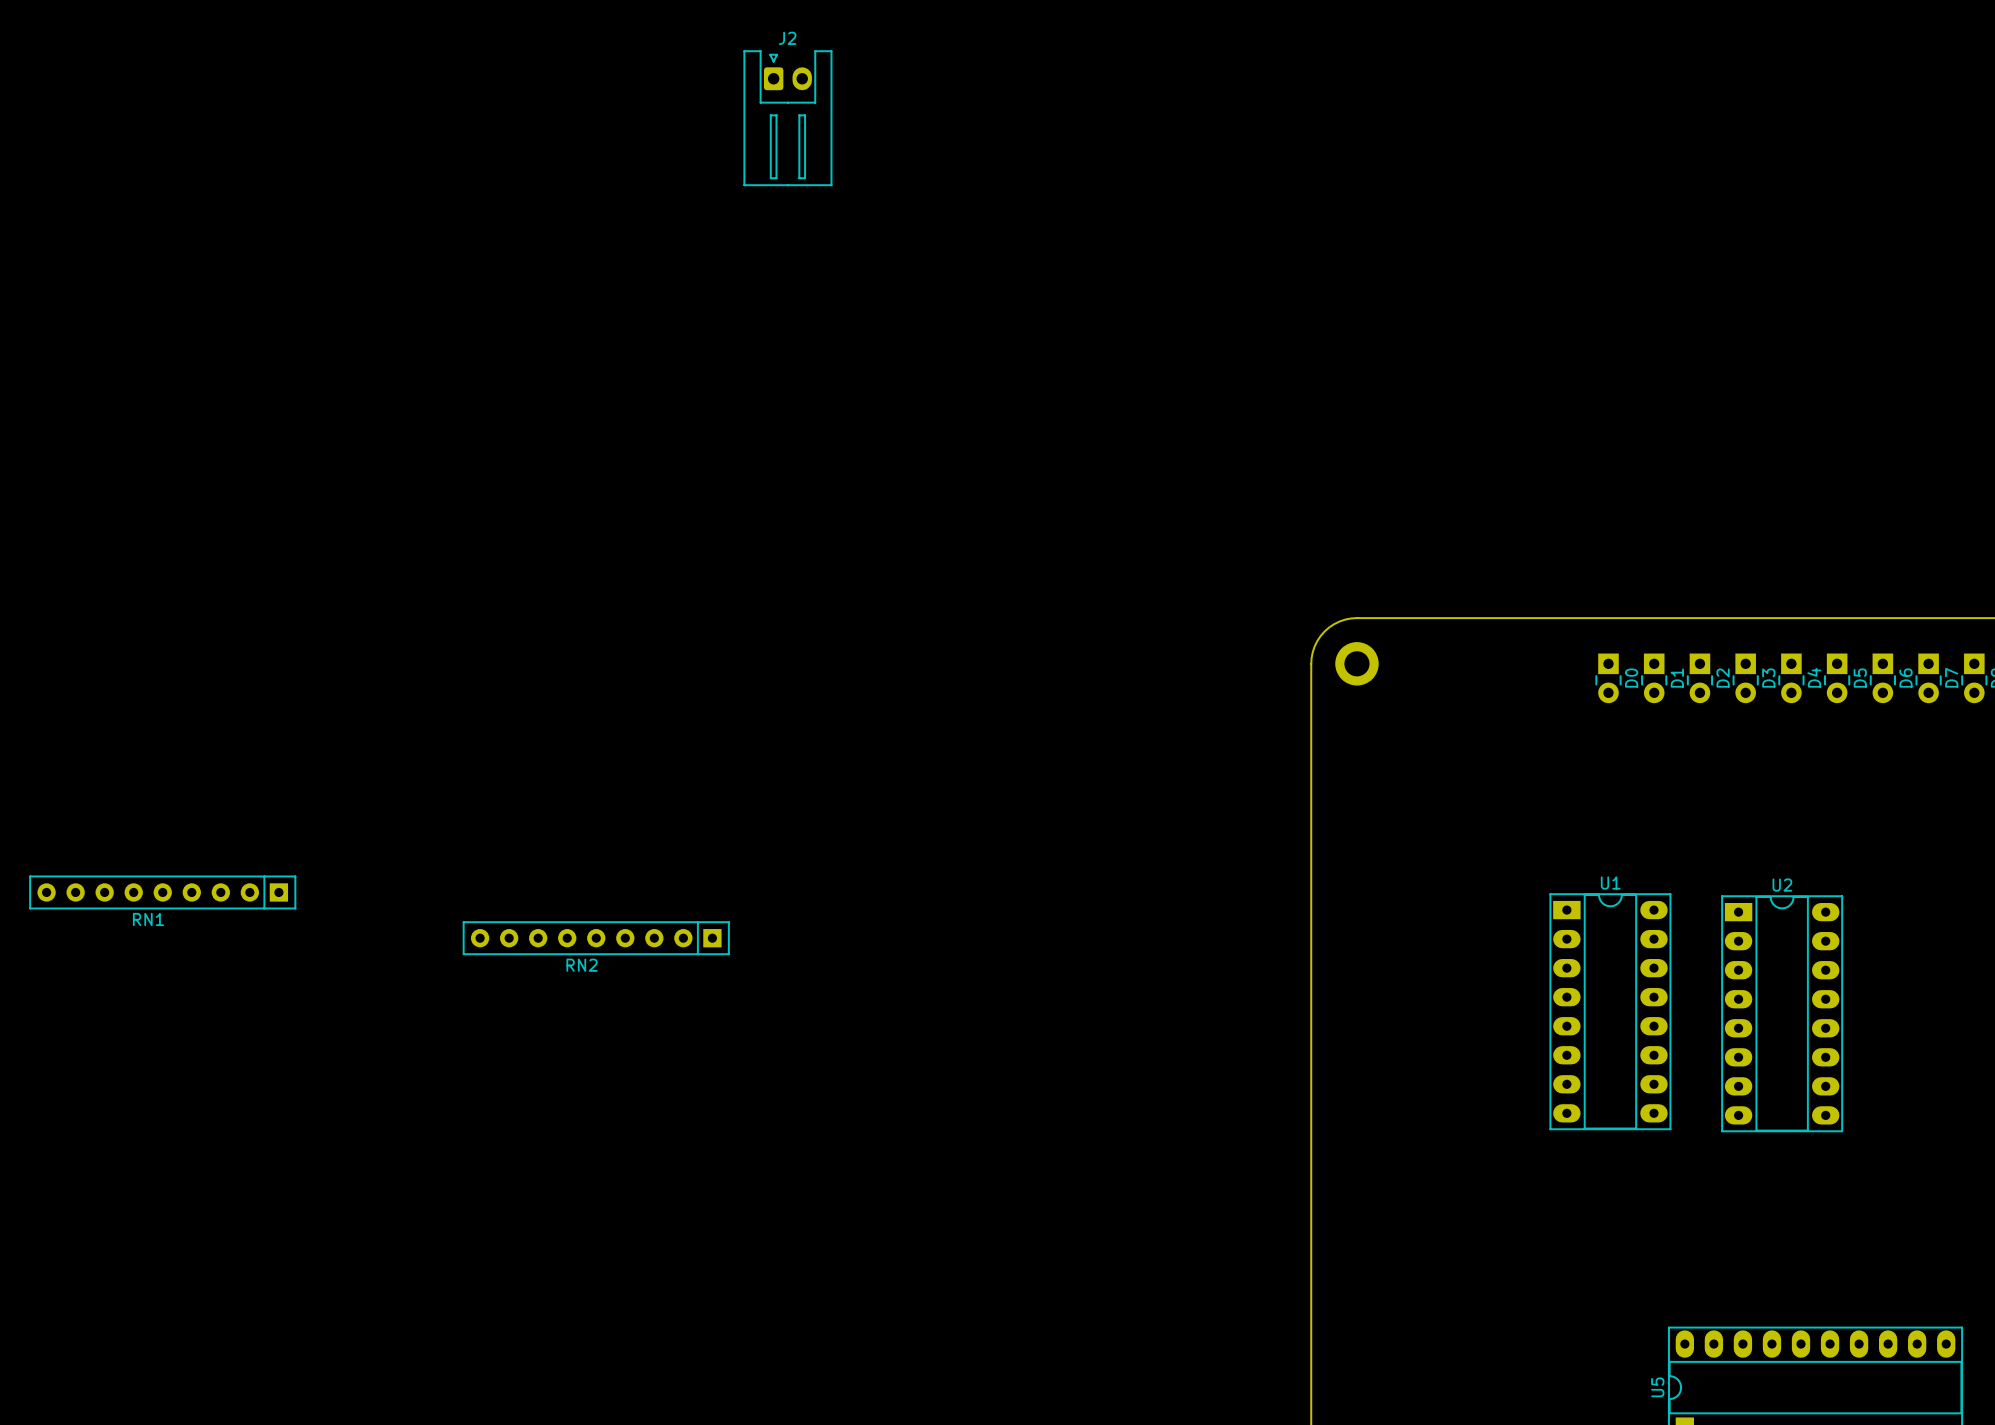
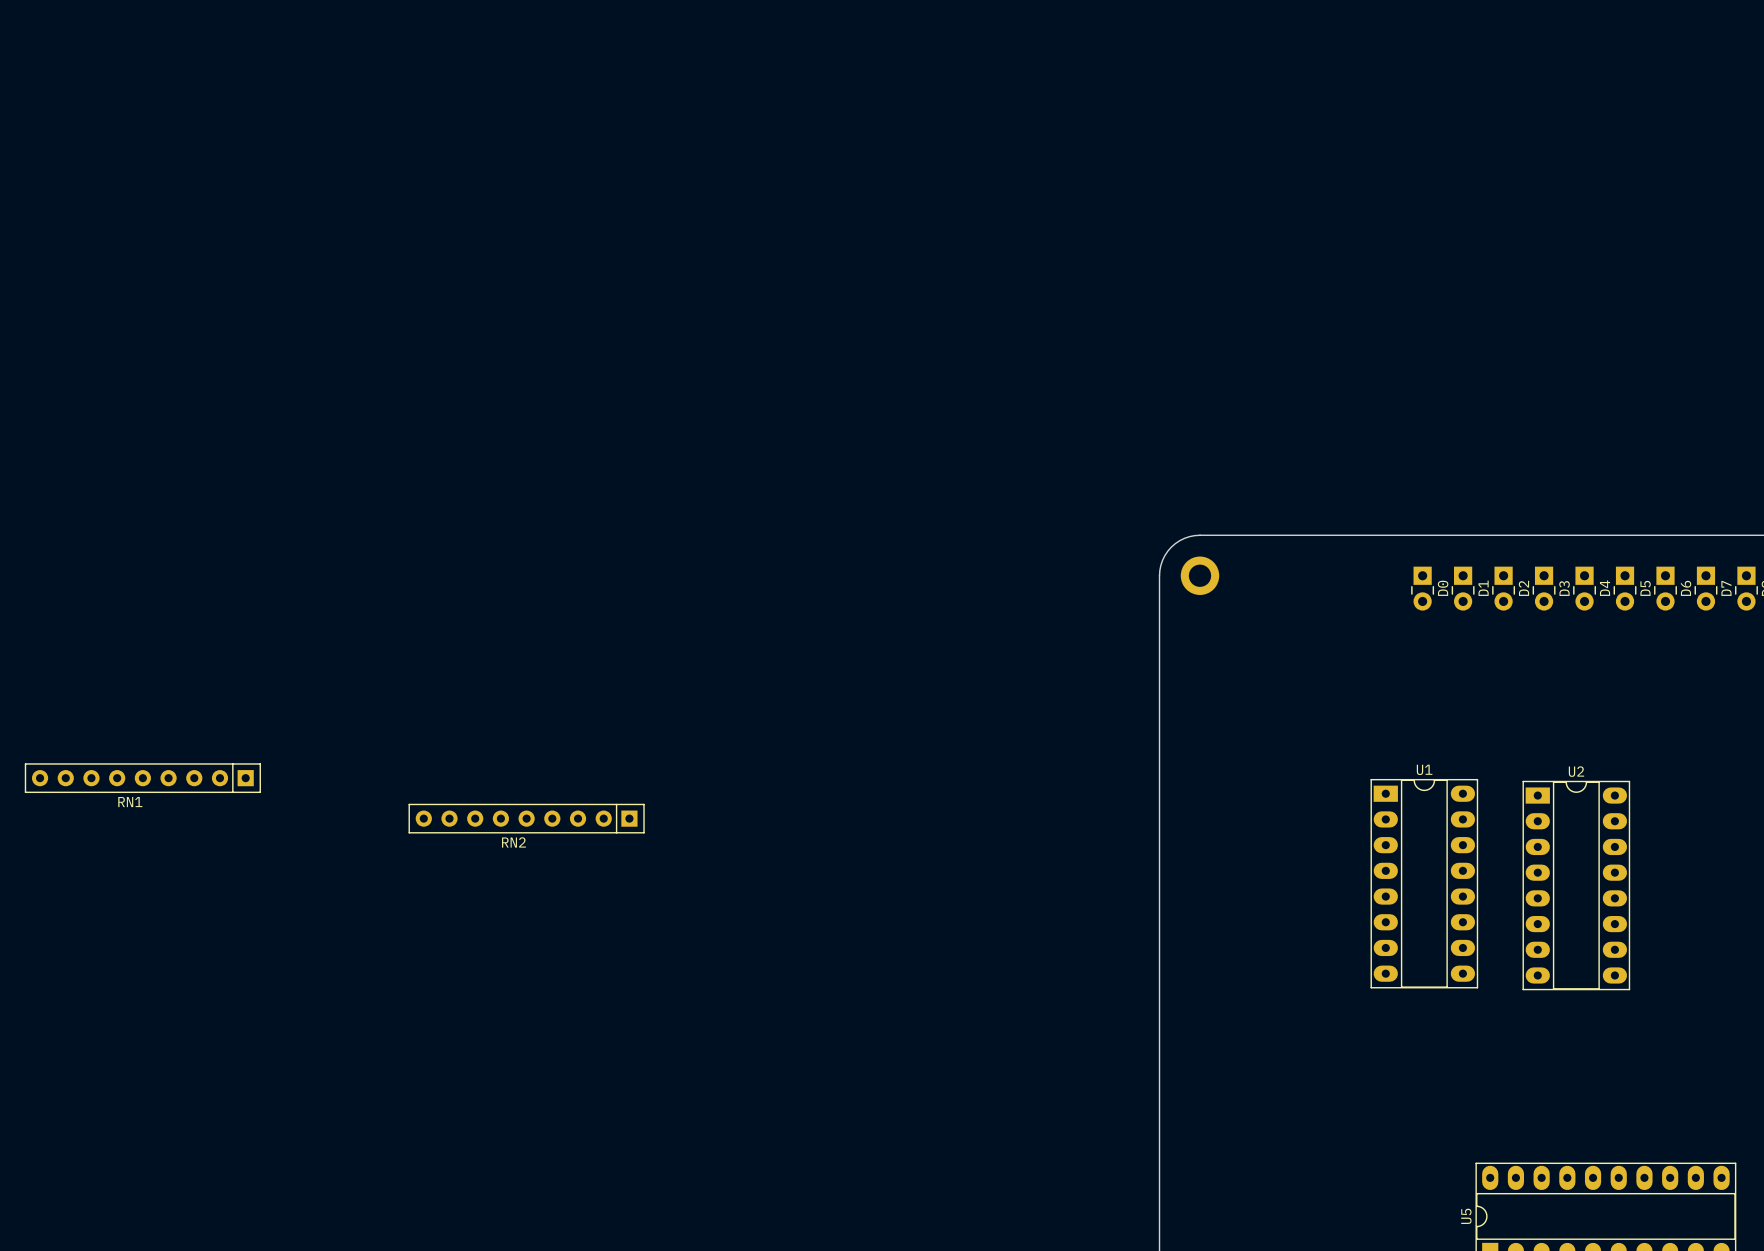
J2: (787, 118) -> none

